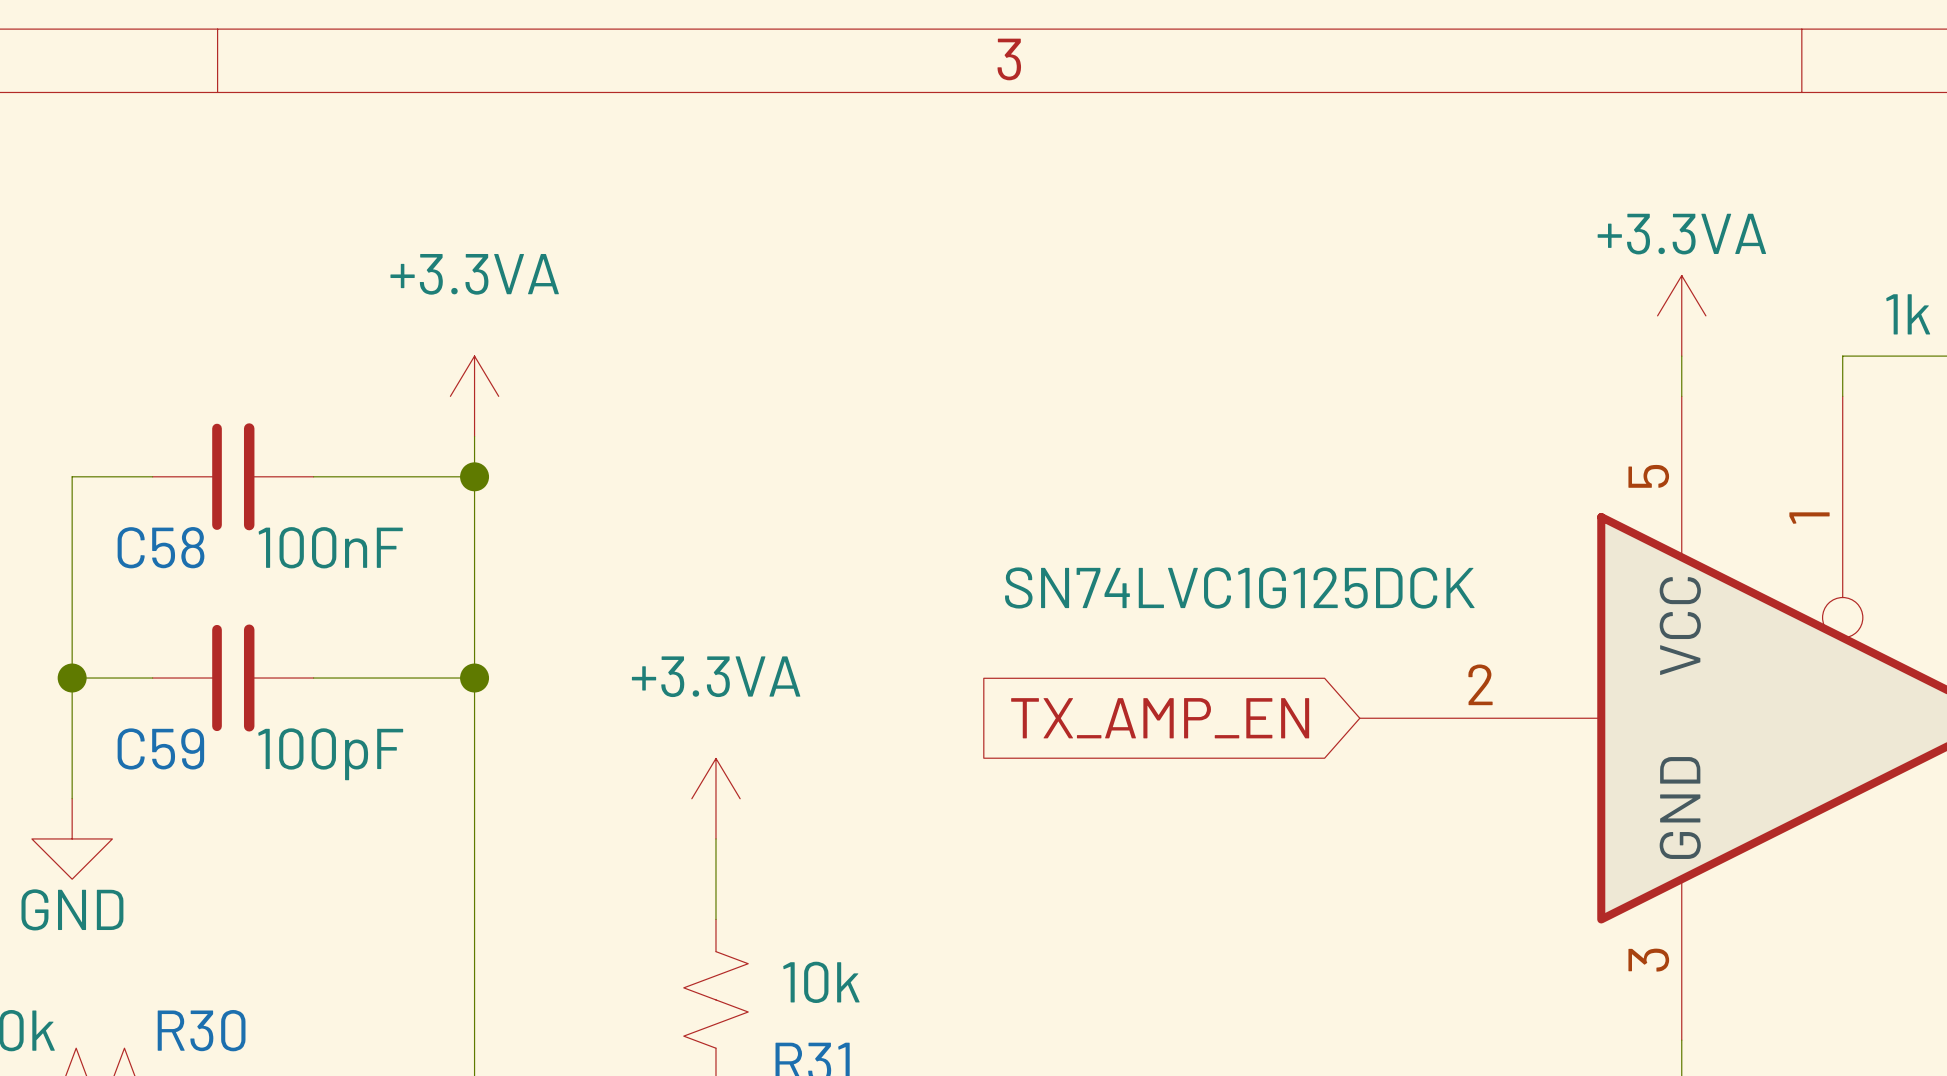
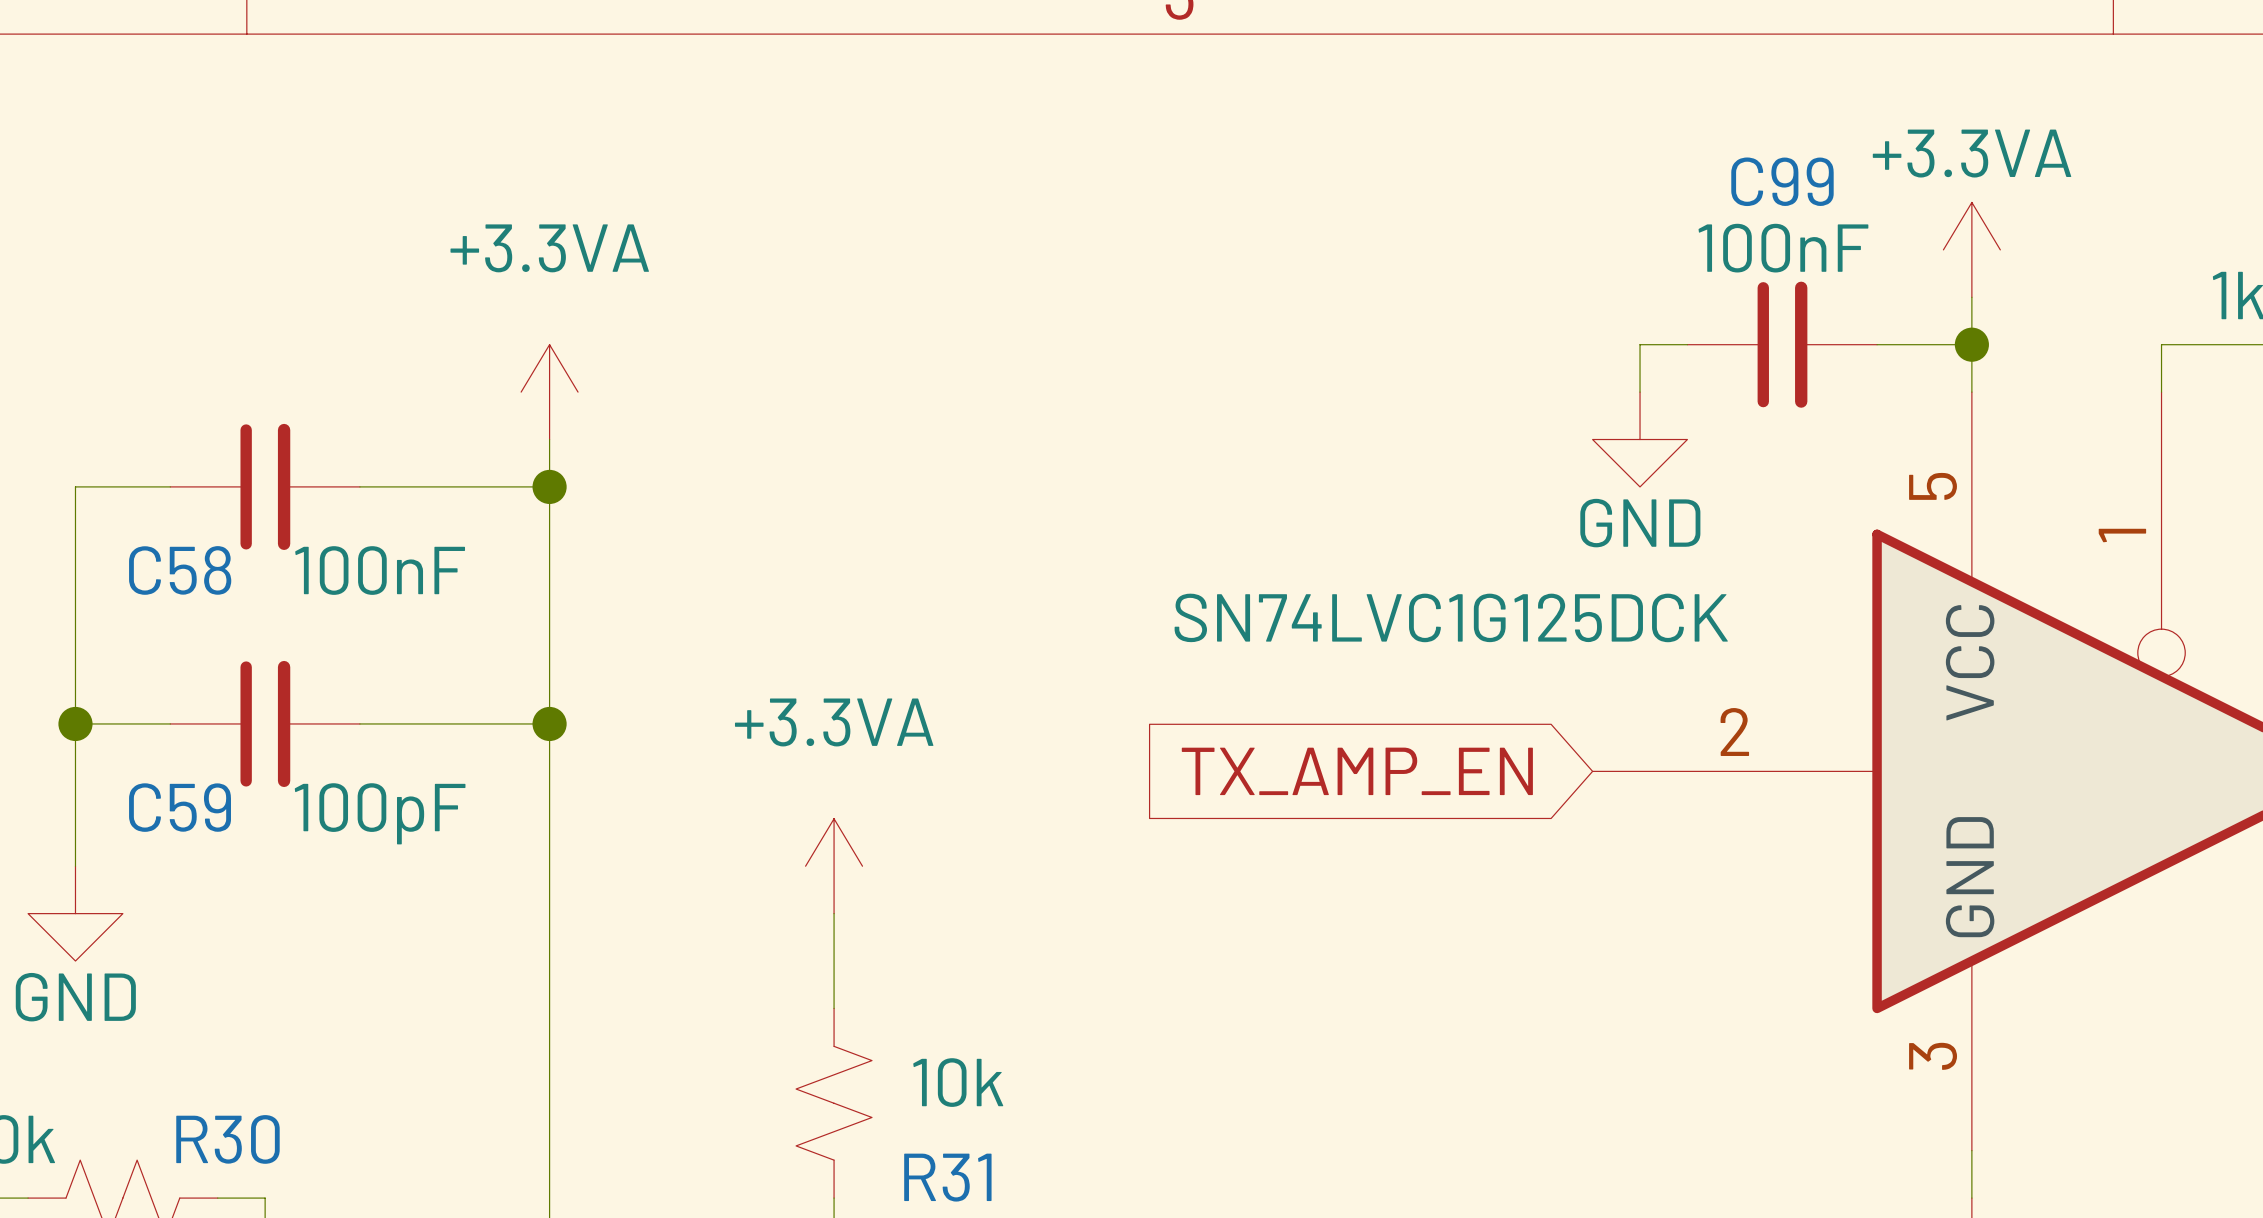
wire: none -> (1971, 297) (1971, 344) (1877, 344)
power symbol position: +3.3VA (1681, 315) -> +3.3VA (1971, 249)
wire: none -> (1687, 344) (1640, 344) (1640, 392)
C99: none -> 100nF (1782, 344)
junction: none -> (1971, 344)
power symbol: none -> GND (1640, 439)

